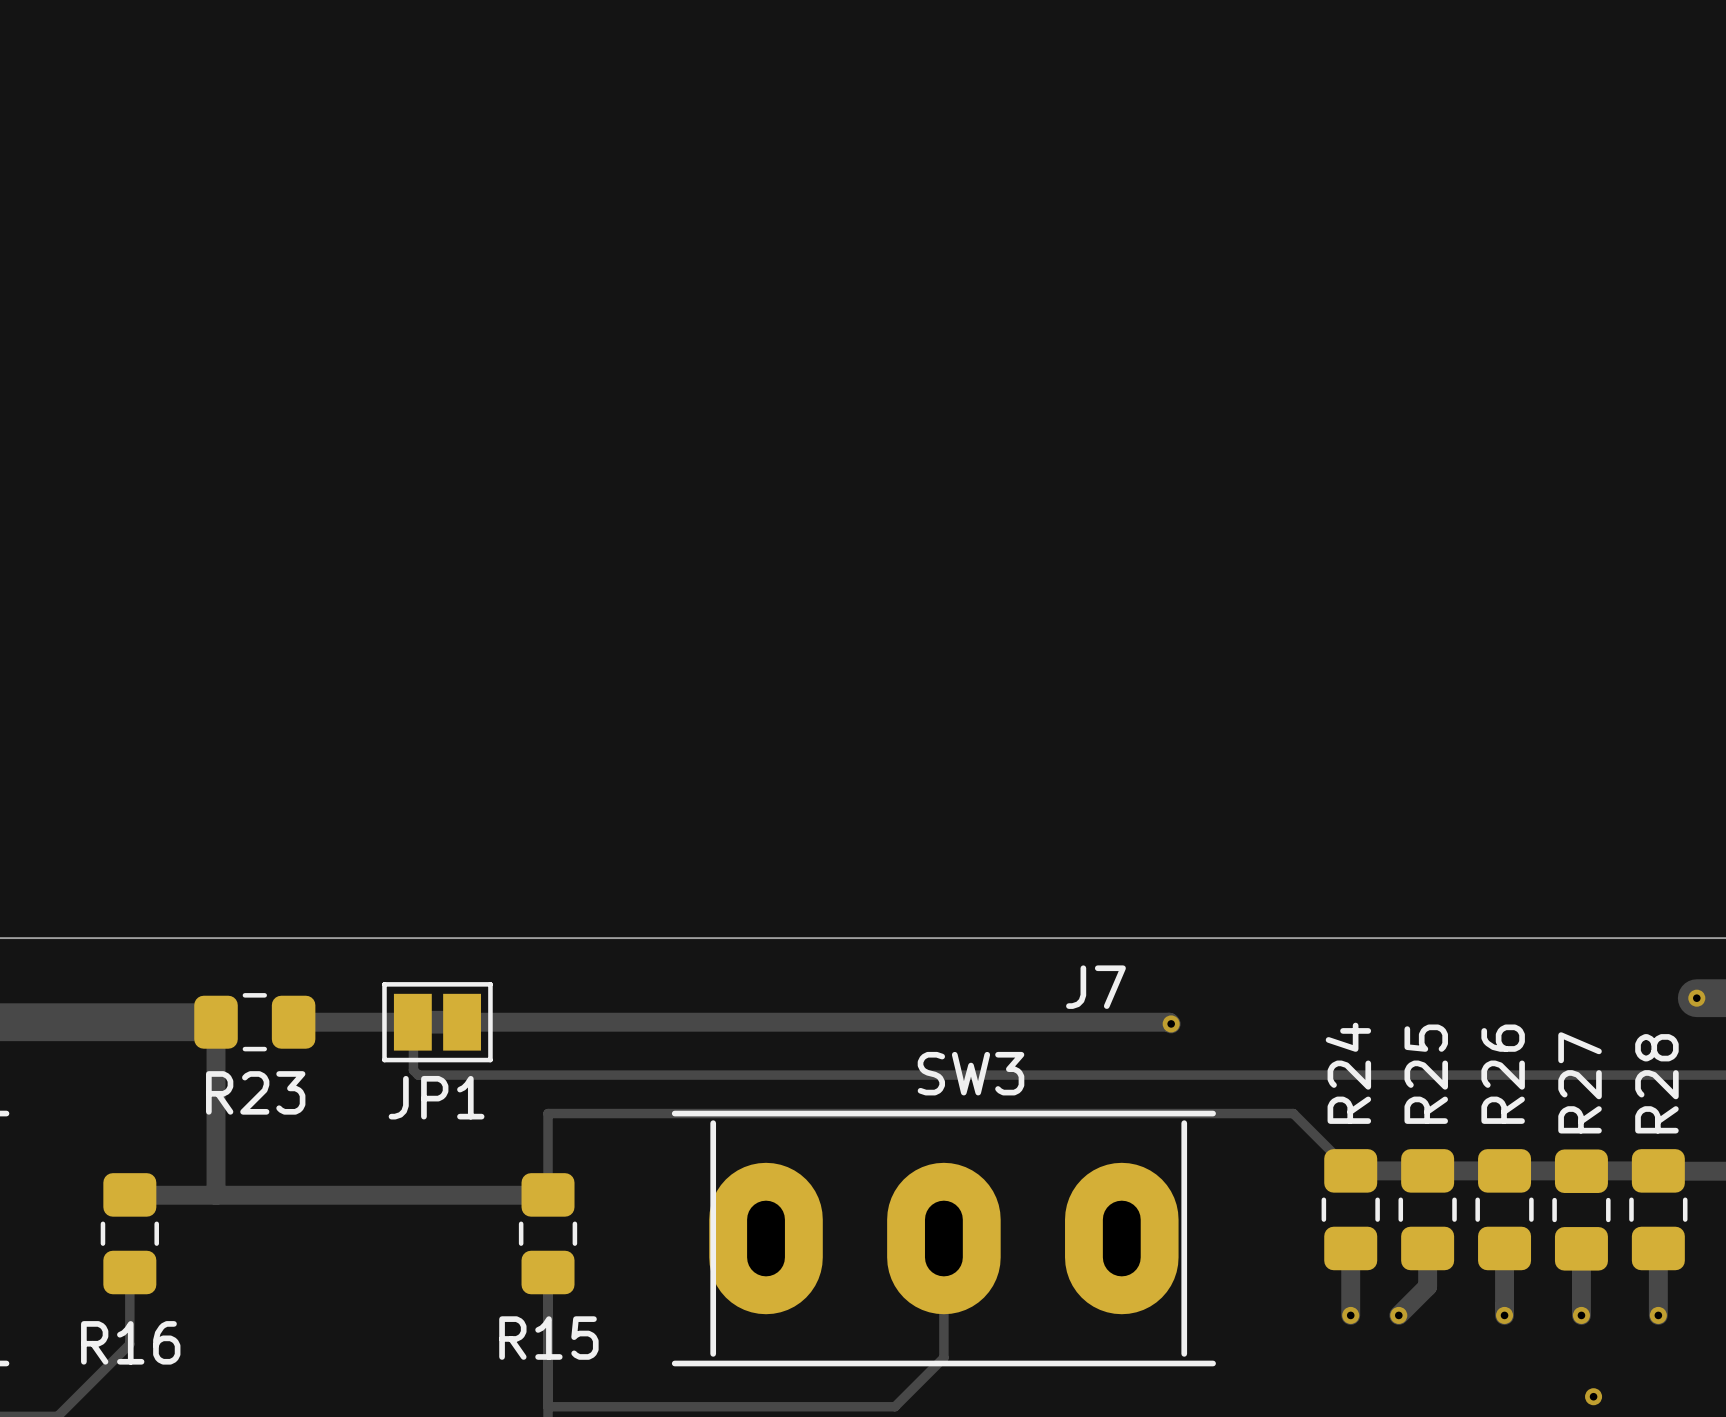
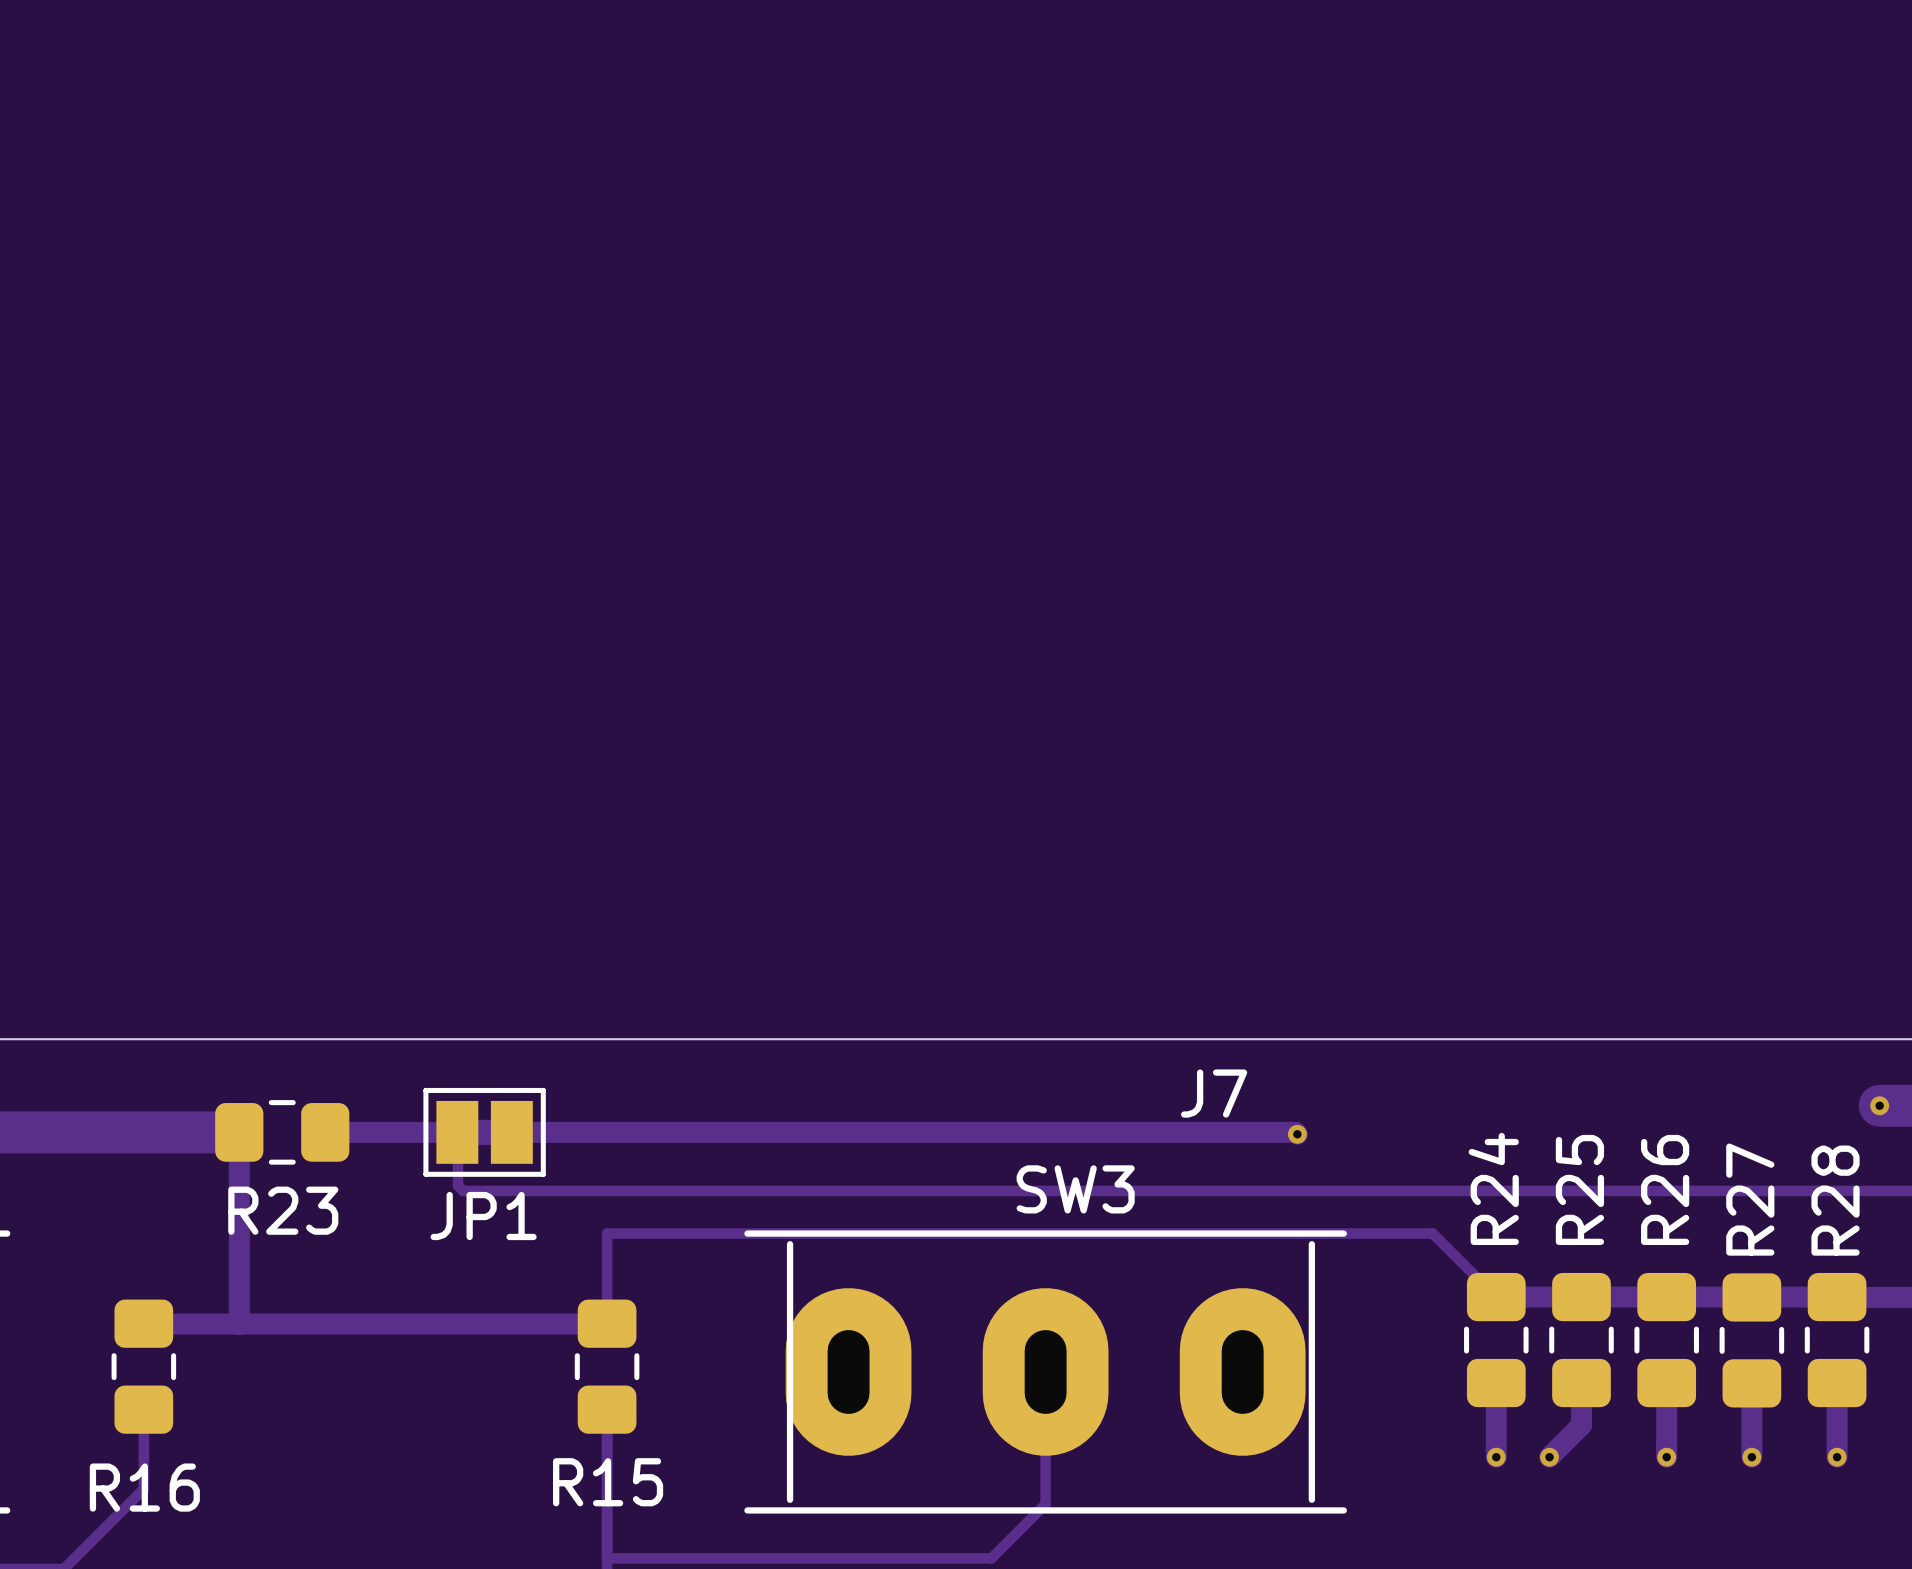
via: (1593, 1396) -> none

